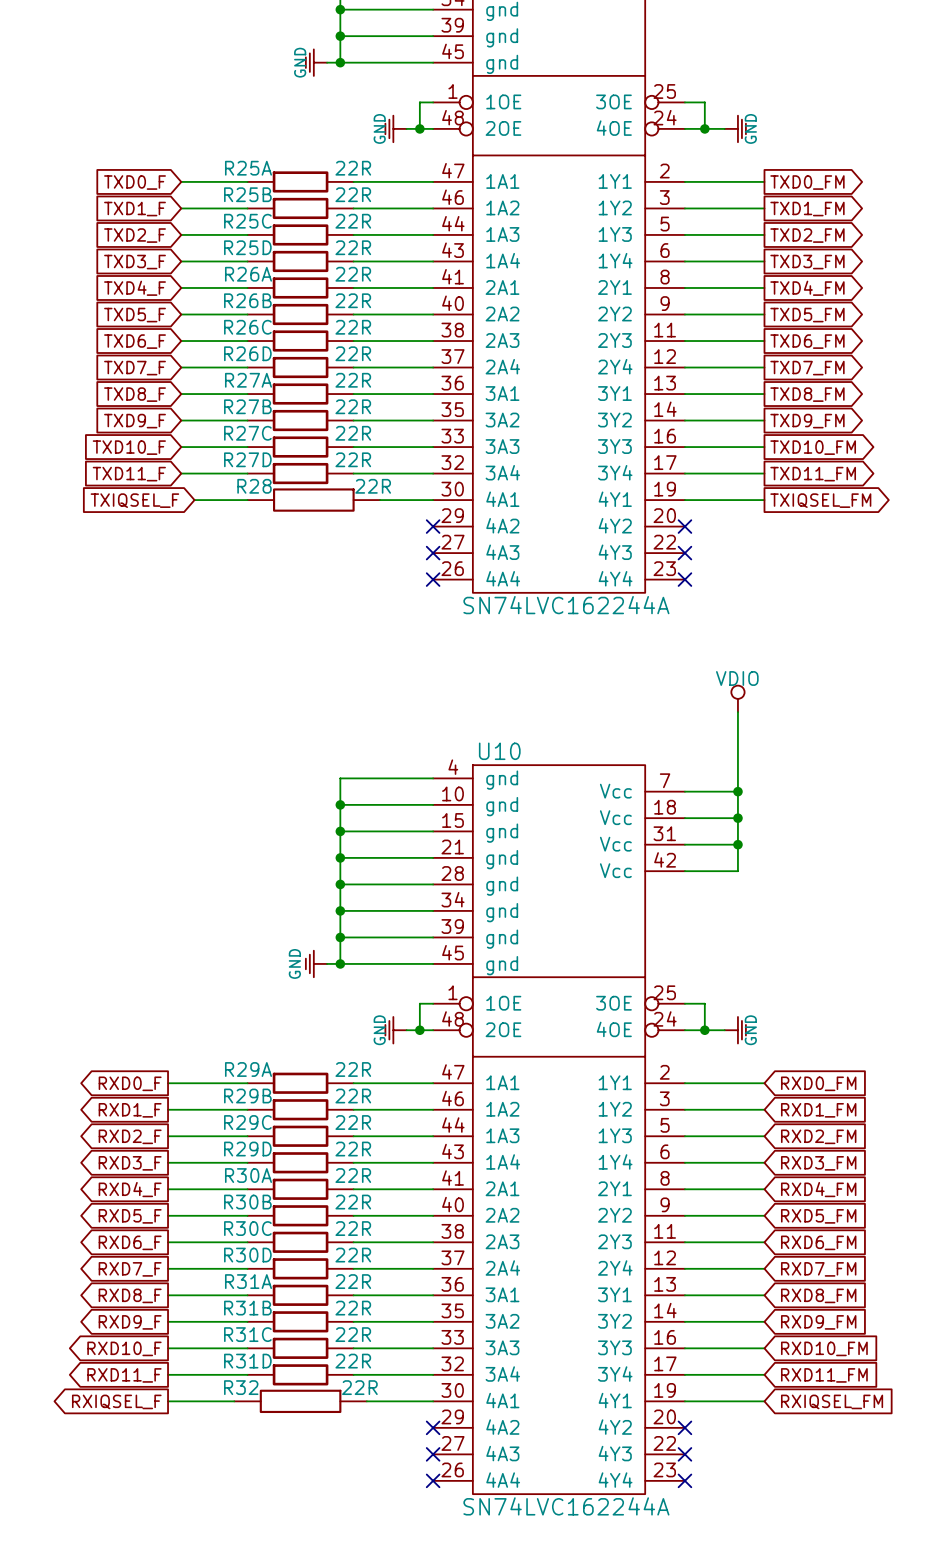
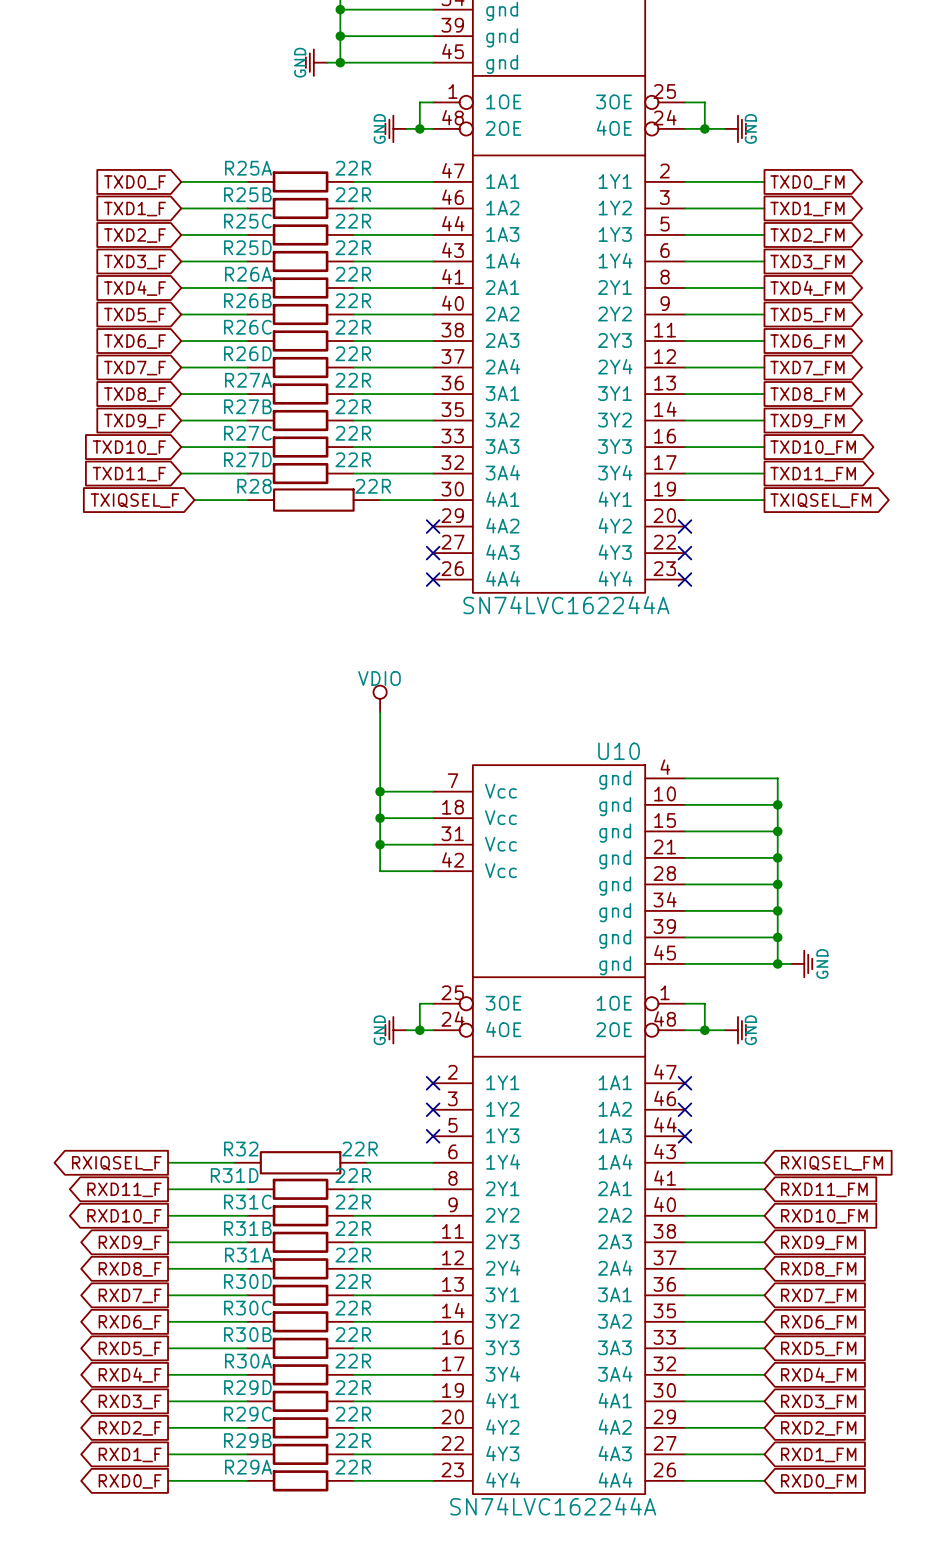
power symbol: none -> VDIO (380, 698)
power symbol: VDIO (737, 698) -> none
wire: none -> (380, 712) (380, 871) (433, 871)
wire: (737, 712) (737, 871) (684, 871) -> none
wire: (433, 778) (340, 778) (340, 963) -> none
wire: none -> (684, 778) (777, 778) (777, 963)
wire: none -> (380, 791) (433, 791)
junction: none -> (380, 791)
wire: (684, 791) (737, 791) -> none
junction: (737, 791) -> none
wire: (340, 804) (433, 804) -> none
junction: (340, 804) -> none
wire: none -> (684, 804) (777, 804)
junction: none -> (777, 804)
wire: none -> (380, 818) (433, 818)
junction: none -> (380, 818)
wire: (684, 818) (737, 818) -> none
junction: (737, 818) -> none
wire: (340, 831) (433, 831) -> none
junction: (340, 831) -> none
wire: none -> (684, 831) (777, 831)
junction: none -> (777, 831)
wire: none -> (380, 844) (433, 844)
junction: none -> (380, 844)
wire: (684, 844) (737, 844) -> none
junction: (737, 844) -> none
wire: (340, 857) (433, 857) -> none
junction: (340, 857) -> none
wire: none -> (684, 857) (777, 857)
junction: none -> (777, 857)
wire: (340, 884) (433, 884) -> none
junction: (340, 884) -> none
wire: none -> (684, 884) (777, 884)
junction: none -> (777, 884)
wire: (340, 910) (433, 910) -> none
junction: (340, 910) -> none
wire: none -> (684, 910) (777, 910)
junction: none -> (777, 910)
wire: (340, 937) (433, 937) -> none
junction: (340, 937) -> none
wire: none -> (684, 937) (777, 937)
junction: none -> (777, 937)
power symbol: GND (316, 963) -> none
wire: (327, 963) (433, 963) -> none
junction: (340, 963) -> none
wire: none -> (684, 963) (790, 963)
junction: none -> (777, 963)
power symbol: none -> GND (801, 963)
global label: RXD0_F (130, 1083) -> none
wire: (168, 1083) (247, 1083) -> none
R29A position: (300, 1083) -> (300, 1480)
wire: (353, 1083) (433, 1083) -> none
no-connect mark: none -> (433, 1083)
wire: (684, 1083) (764, 1083) -> none
no-connect mark: none -> (684, 1083)
global label: RXD0_FM (818, 1083) -> none
wire: (168, 1109) (247, 1109) -> none
R29B position: (300, 1109) -> (300, 1454)
wire: (353, 1109) (433, 1109) -> none
no-connect mark: none -> (433, 1109)
wire: (684, 1109) (764, 1109) -> none
no-connect mark: none -> (684, 1109)
global label: RXD1_F (130, 1110) -> none
global label: RXD1_FM (818, 1110) -> none
U10 flip: as is (559, 1129) -> left-right (559, 1129)
global label: RXD2_F (130, 1136) -> none
wire: (168, 1136) (247, 1136) -> none
R29C position: (300, 1136) -> (300, 1427)
wire: (353, 1136) (433, 1136) -> none
no-connect mark: none -> (433, 1136)
wire: (684, 1136) (764, 1136) -> none
no-connect mark: none -> (684, 1136)
global label: RXD2_FM (818, 1136) -> none
R29D position: (300, 1162) -> (300, 1401)
global label: RXD3_F (130, 1163) -> RXIQSEL_F (116, 1163)
global label: RXD3_FM (818, 1163) -> RXIQSEL_FM (832, 1163)
R30A name: R30A (248, 1175) -> R31D (234, 1175)
global label: RXD4_F (130, 1189) -> RXD11_F (124, 1189)
global label: RXD4_FM (818, 1189) -> RXD11_FM (824, 1189)
R30B name: R30B (247, 1202) -> R31C (247, 1202)
global label: RXD5_F (130, 1216) -> RXD10_F (124, 1216)
global label: RXD5_FM (818, 1216) -> RXD10_FM (824, 1216)
R30C name: R30C (247, 1228) -> R31B (247, 1228)
global label: RXD6_F (130, 1242) -> RXD9_F (130, 1242)
global label: RXD6_FM (818, 1242) -> RXD9_FM (818, 1242)
R30D name: R30D (247, 1255) -> R31A (248, 1255)
global label: RXD7_F (130, 1269) -> RXD8_F (130, 1269)
global label: RXD7_FM (818, 1269) -> RXD8_FM (818, 1269)
R31A name: R31A (248, 1281) -> R30D (247, 1281)
global label: RXD8_F (130, 1295) -> RXD7_F (130, 1295)
global label: RXD8_FM (818, 1295) -> RXD7_FM (818, 1295)
R31B name: R31B (247, 1308) -> R30C (247, 1308)
global label: RXD9_F (130, 1322) -> RXD6_F (130, 1322)
global label: RXD9_FM (818, 1322) -> RXD6_FM (818, 1322)
R31C name: R31C (247, 1334) -> R30B (247, 1334)
global label: RXD10_F (124, 1348) -> RXD5_F (130, 1348)
global label: RXD10_FM (824, 1348) -> RXD5_FM (818, 1348)
R31D name: R31D (247, 1361) -> R30A (248, 1361)
global label: RXD11_F (124, 1375) -> RXD4_F (130, 1375)
global label: RXD11_FM (824, 1375) -> RXD4_FM (818, 1375)
global label: RXIQSEL_F (116, 1401) -> RXD3_F (130, 1401)
R32 position: (300, 1401) -> (300, 1162)
global label: RXIQSEL_FM (832, 1401) -> RXD3_FM (818, 1401)
wire: none -> (168, 1427) (247, 1427)
wire: none -> (353, 1427) (433, 1427)
no-connect mark: (433, 1427) -> none
wire: none -> (684, 1427) (764, 1427)
no-connect mark: (684, 1427) -> none
global label: none -> RXD2_F (130, 1428)
global label: none -> RXD2_FM (818, 1428)
global label: none -> RXD1_F (130, 1454)
wire: none -> (168, 1454) (247, 1454)
wire: none -> (353, 1454) (433, 1454)
no-connect mark: (433, 1454) -> none
wire: none -> (684, 1454) (764, 1454)
no-connect mark: (684, 1454) -> none
global label: none -> RXD1_FM (818, 1454)
wire: none -> (168, 1480) (247, 1480)
wire: none -> (353, 1480) (433, 1480)
no-connect mark: (433, 1480) -> none
wire: none -> (684, 1480) (764, 1480)
no-connect mark: (684, 1480) -> none
global label: none -> RXD0_F (130, 1481)
global label: none -> RXD0_FM (818, 1481)

